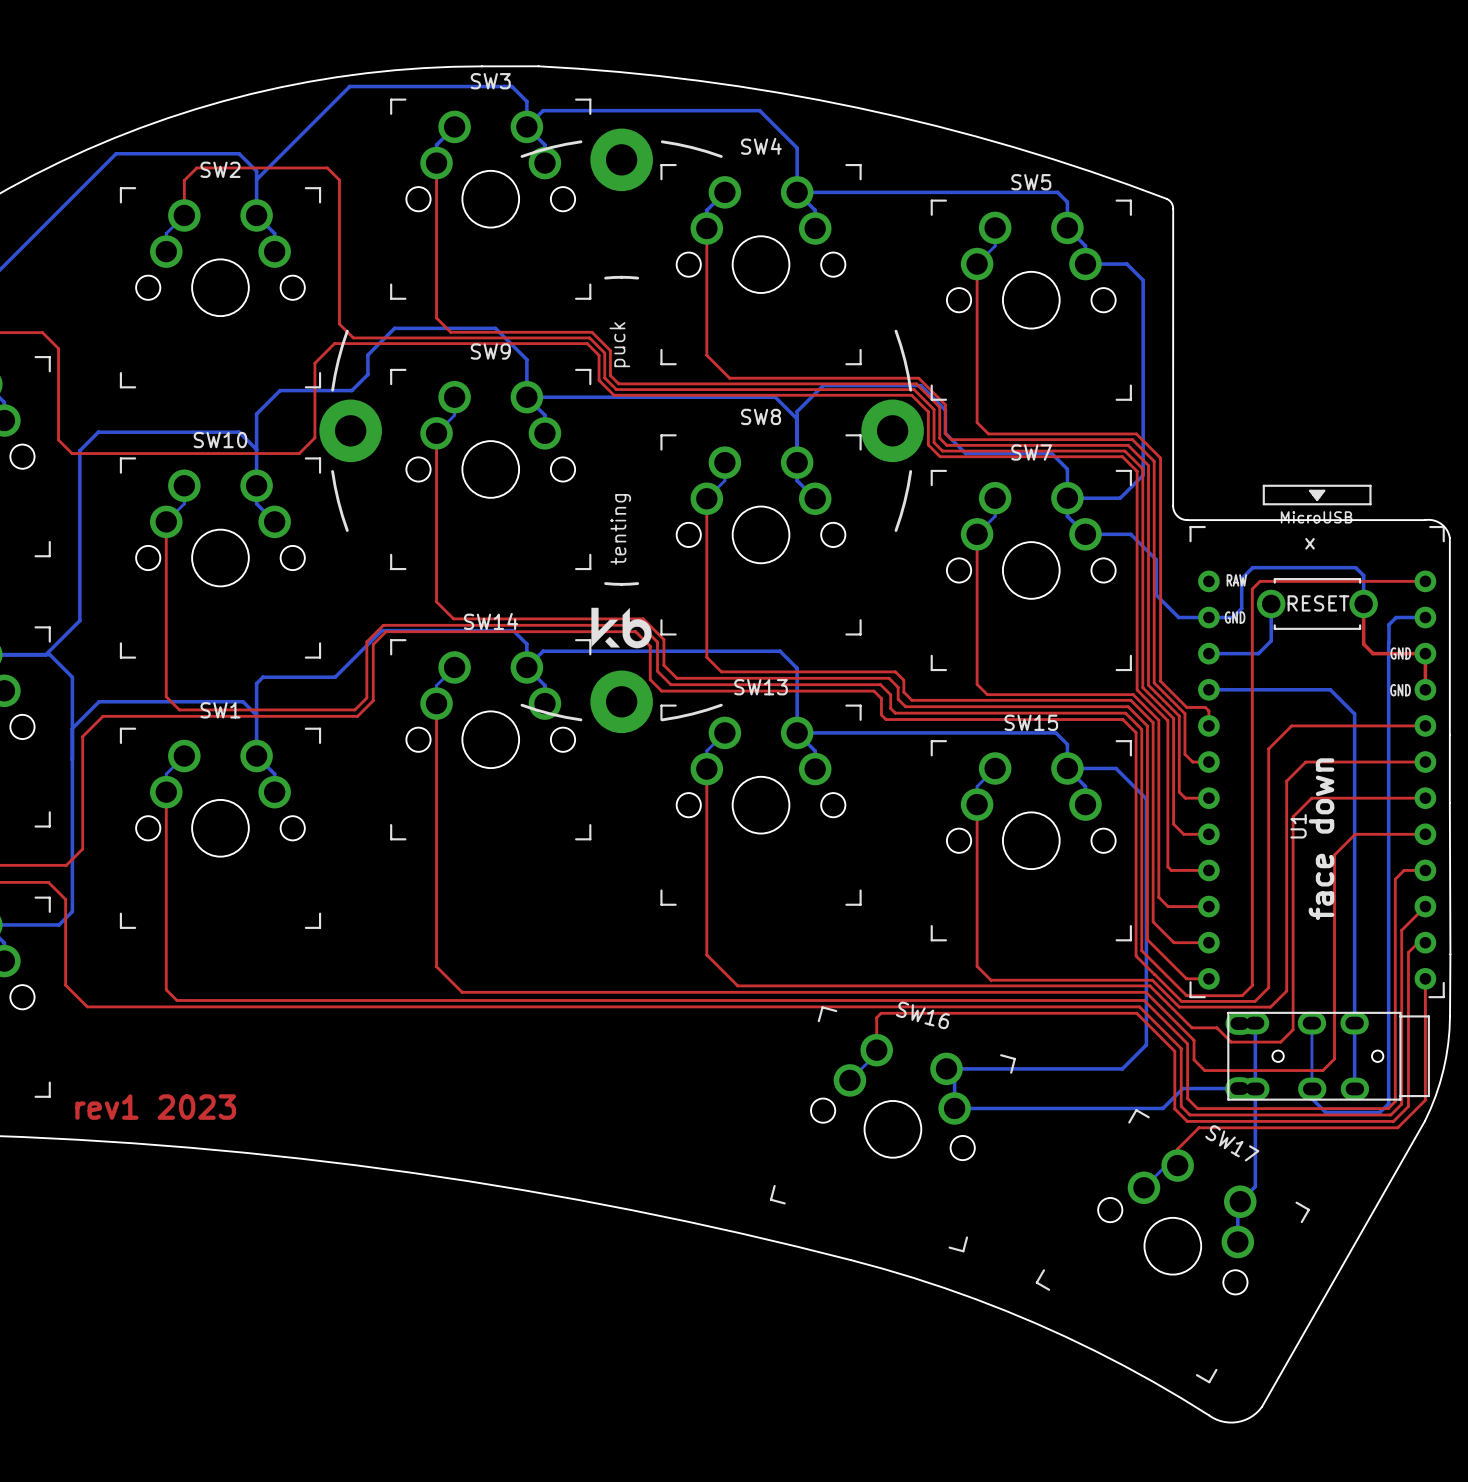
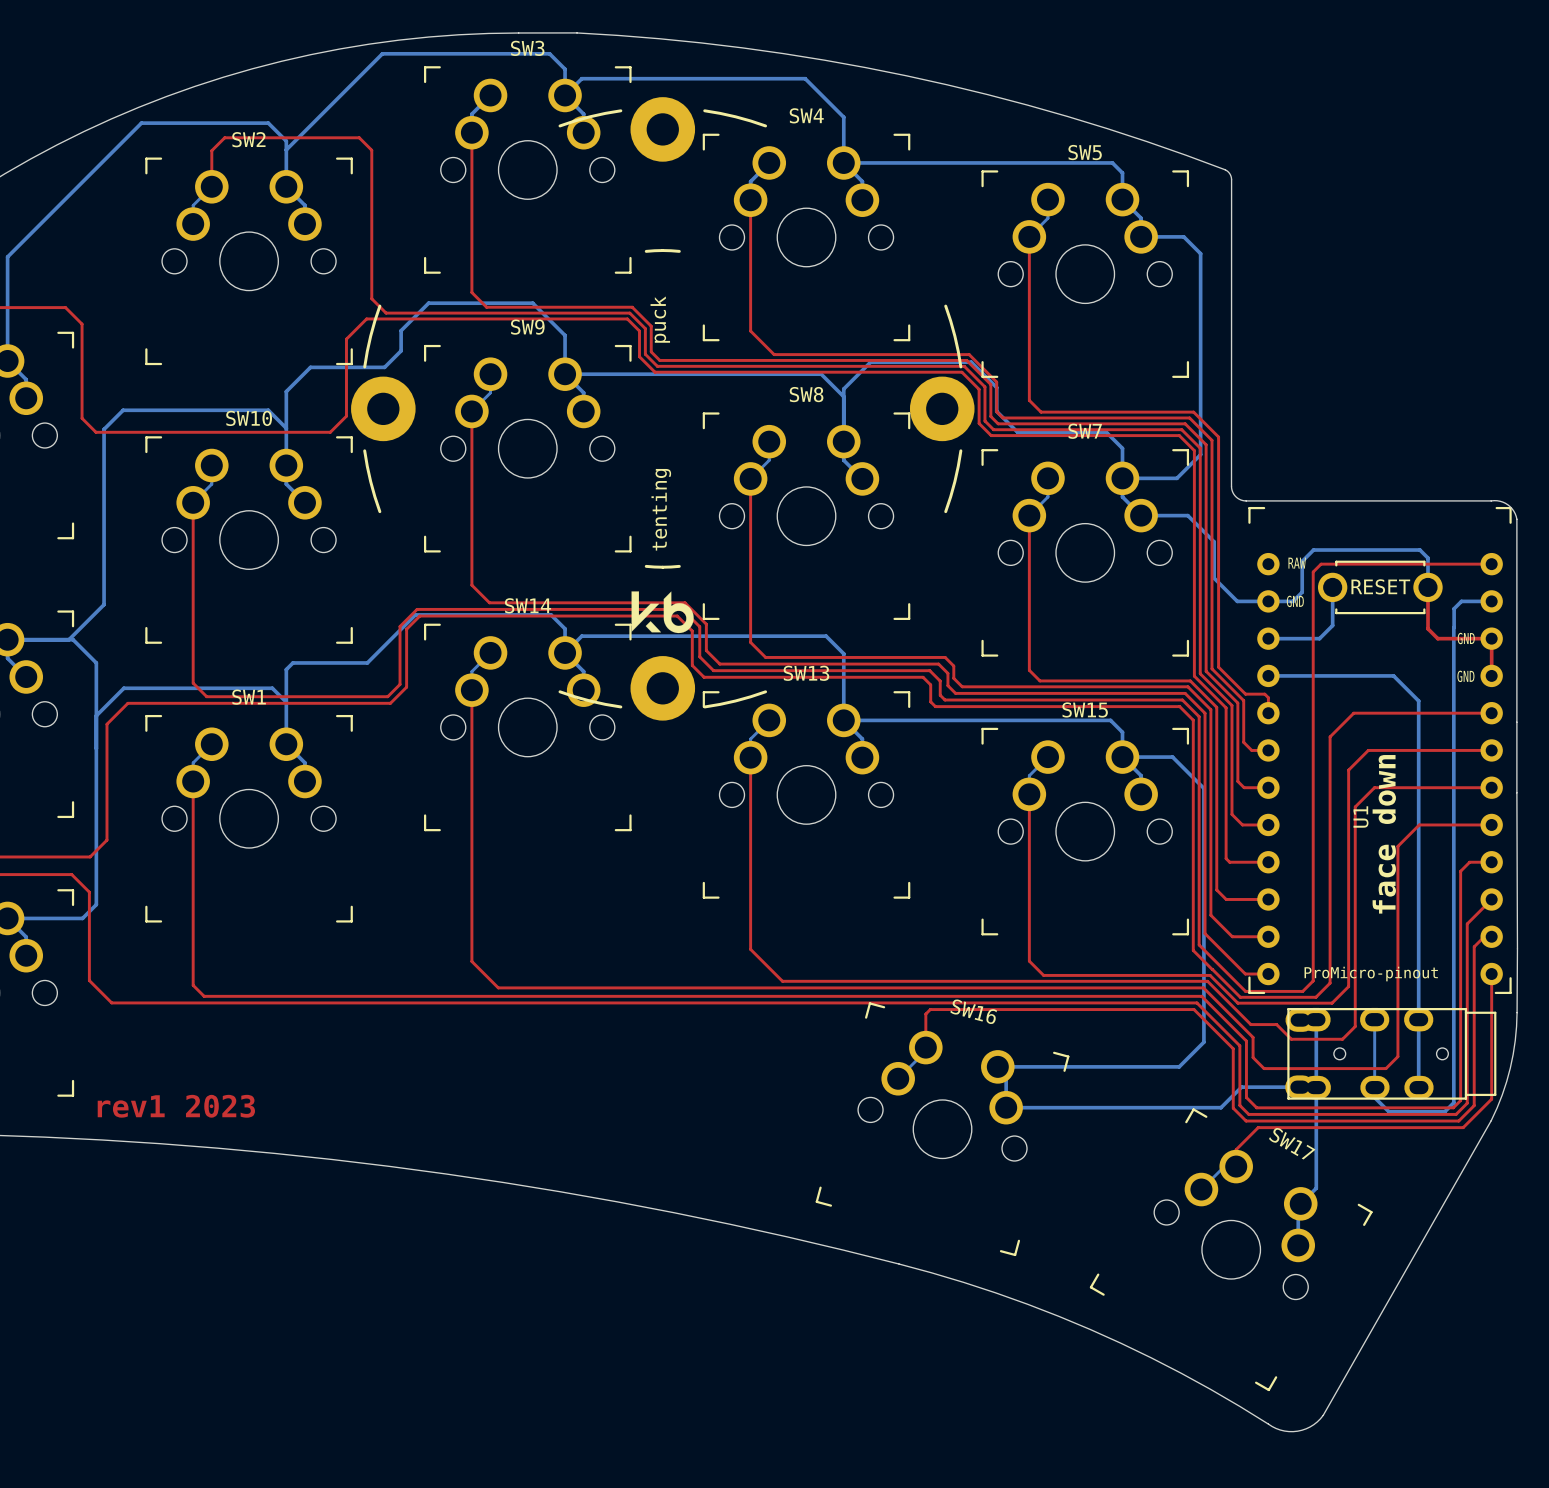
U1 footprint: [1189, 484, 1445, 999] -> [1248, 506, 1512, 995]
U1 value: none -> ProMicro-pinout (1371, 974)

